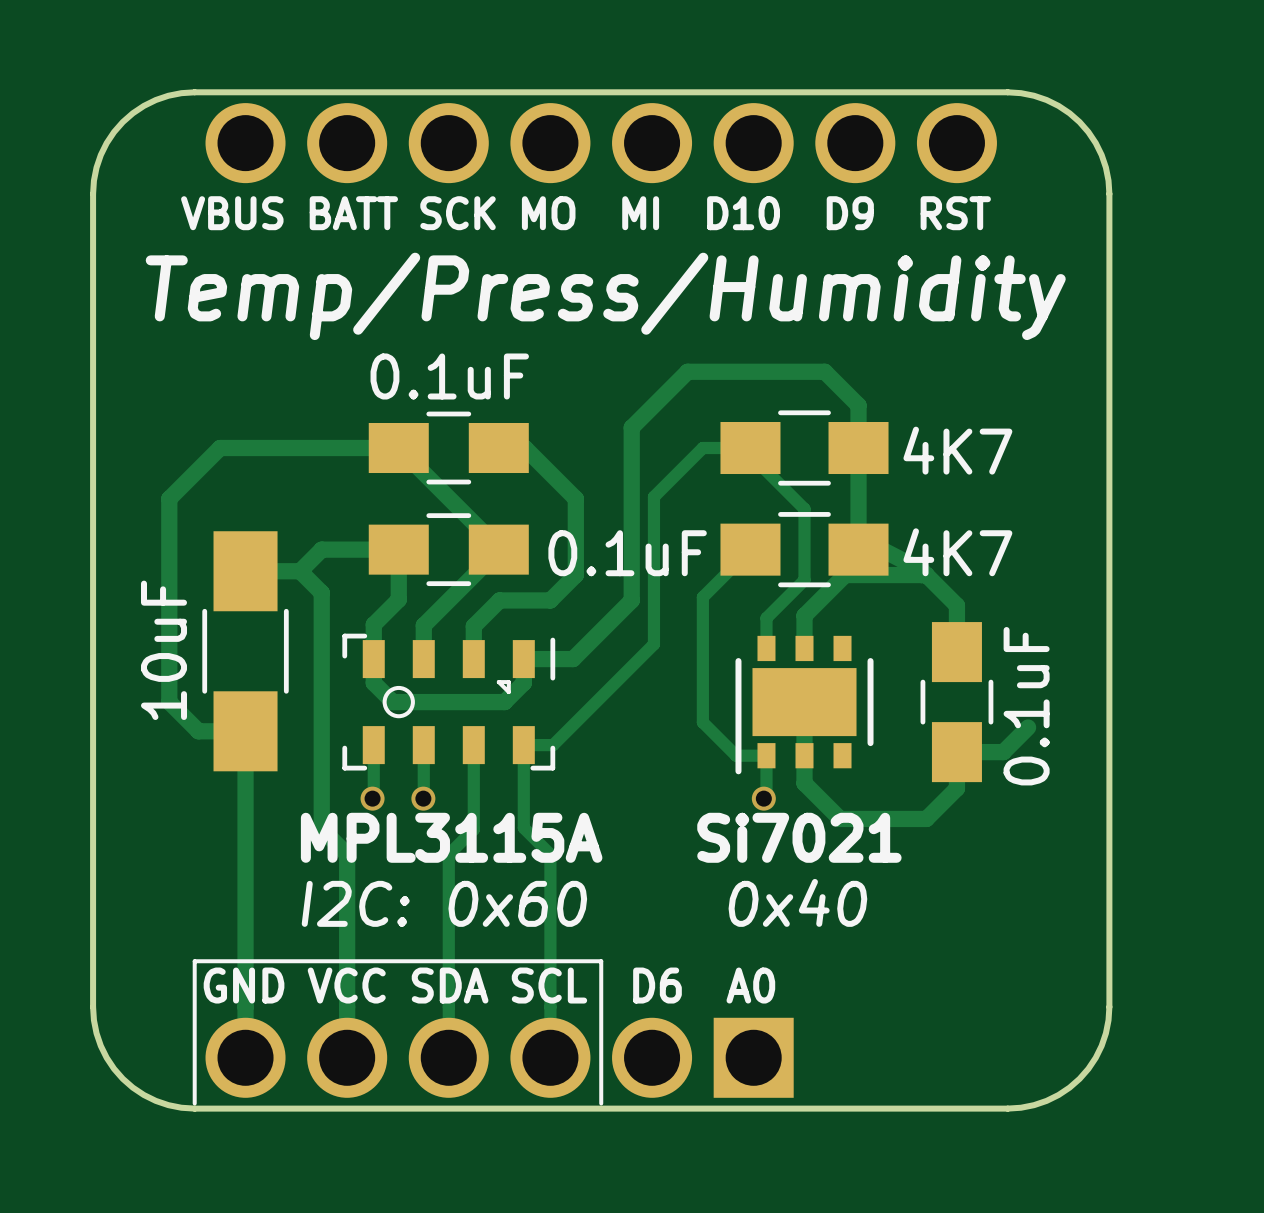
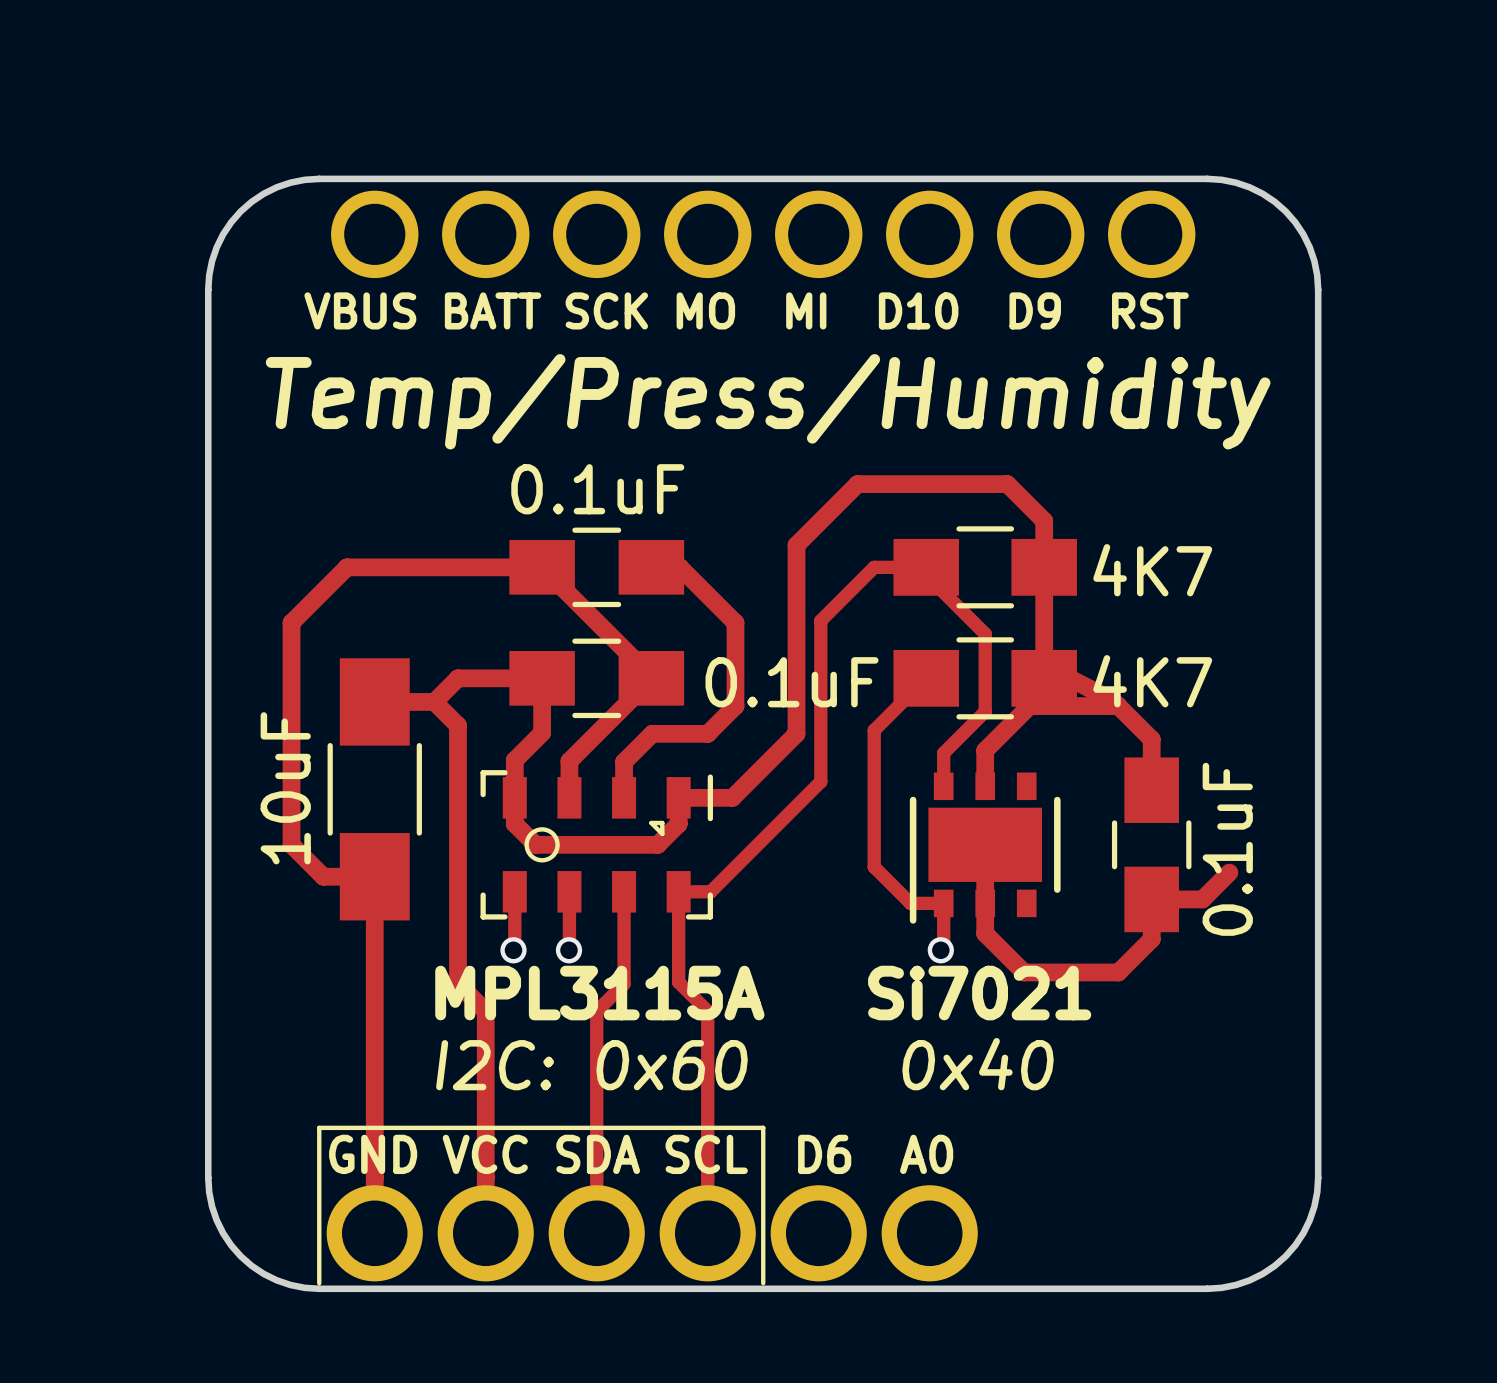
part footprint: [192, 959, 794, 1106] -> [317, 1125, 978, 1286]

